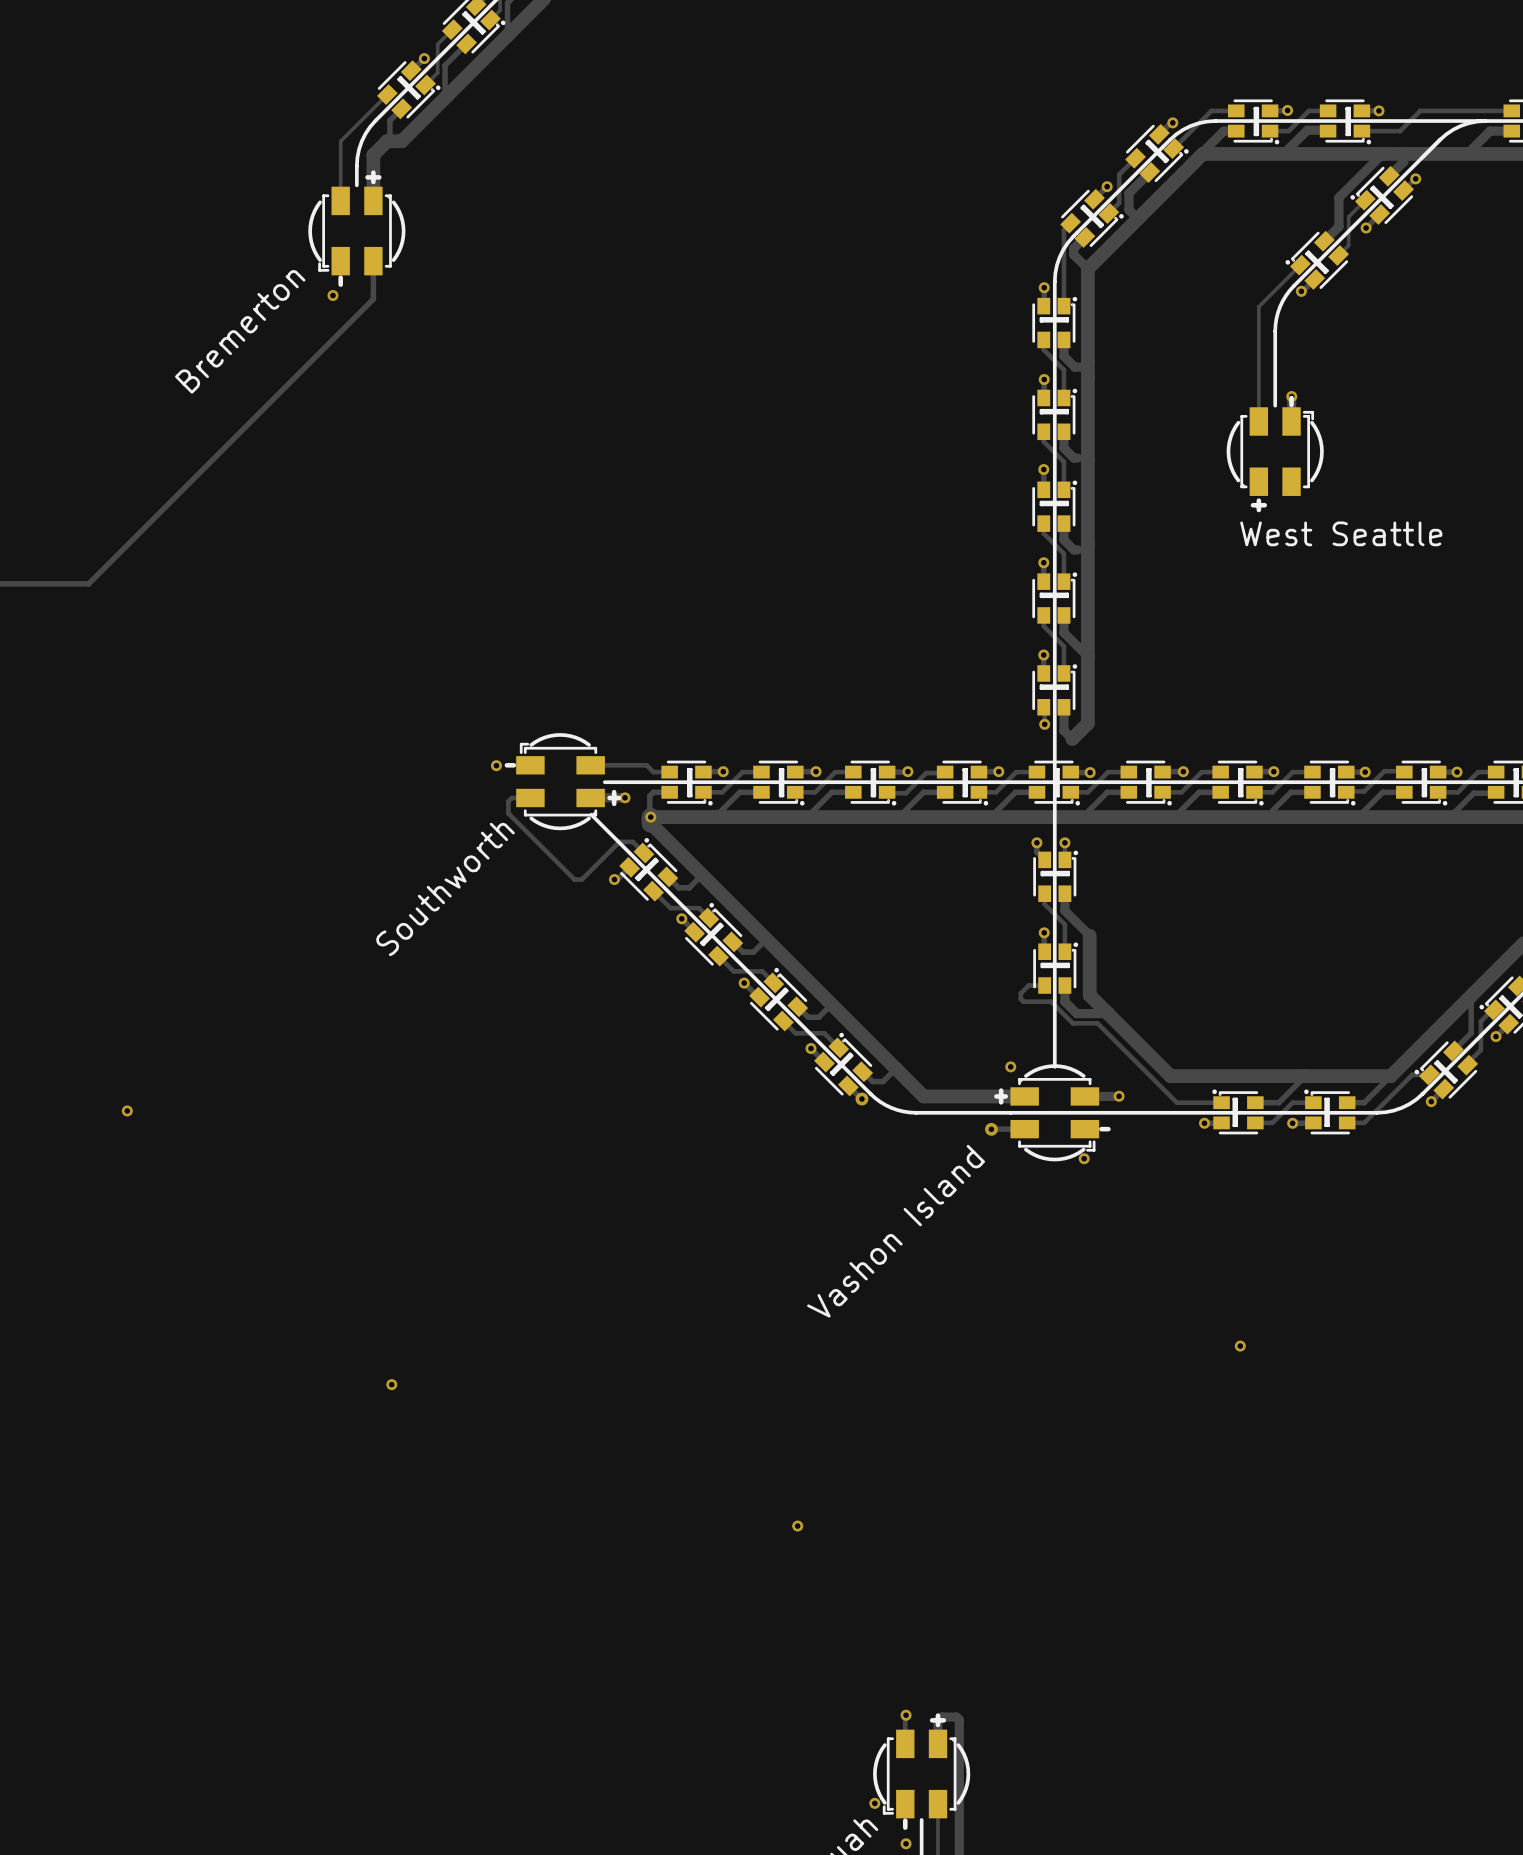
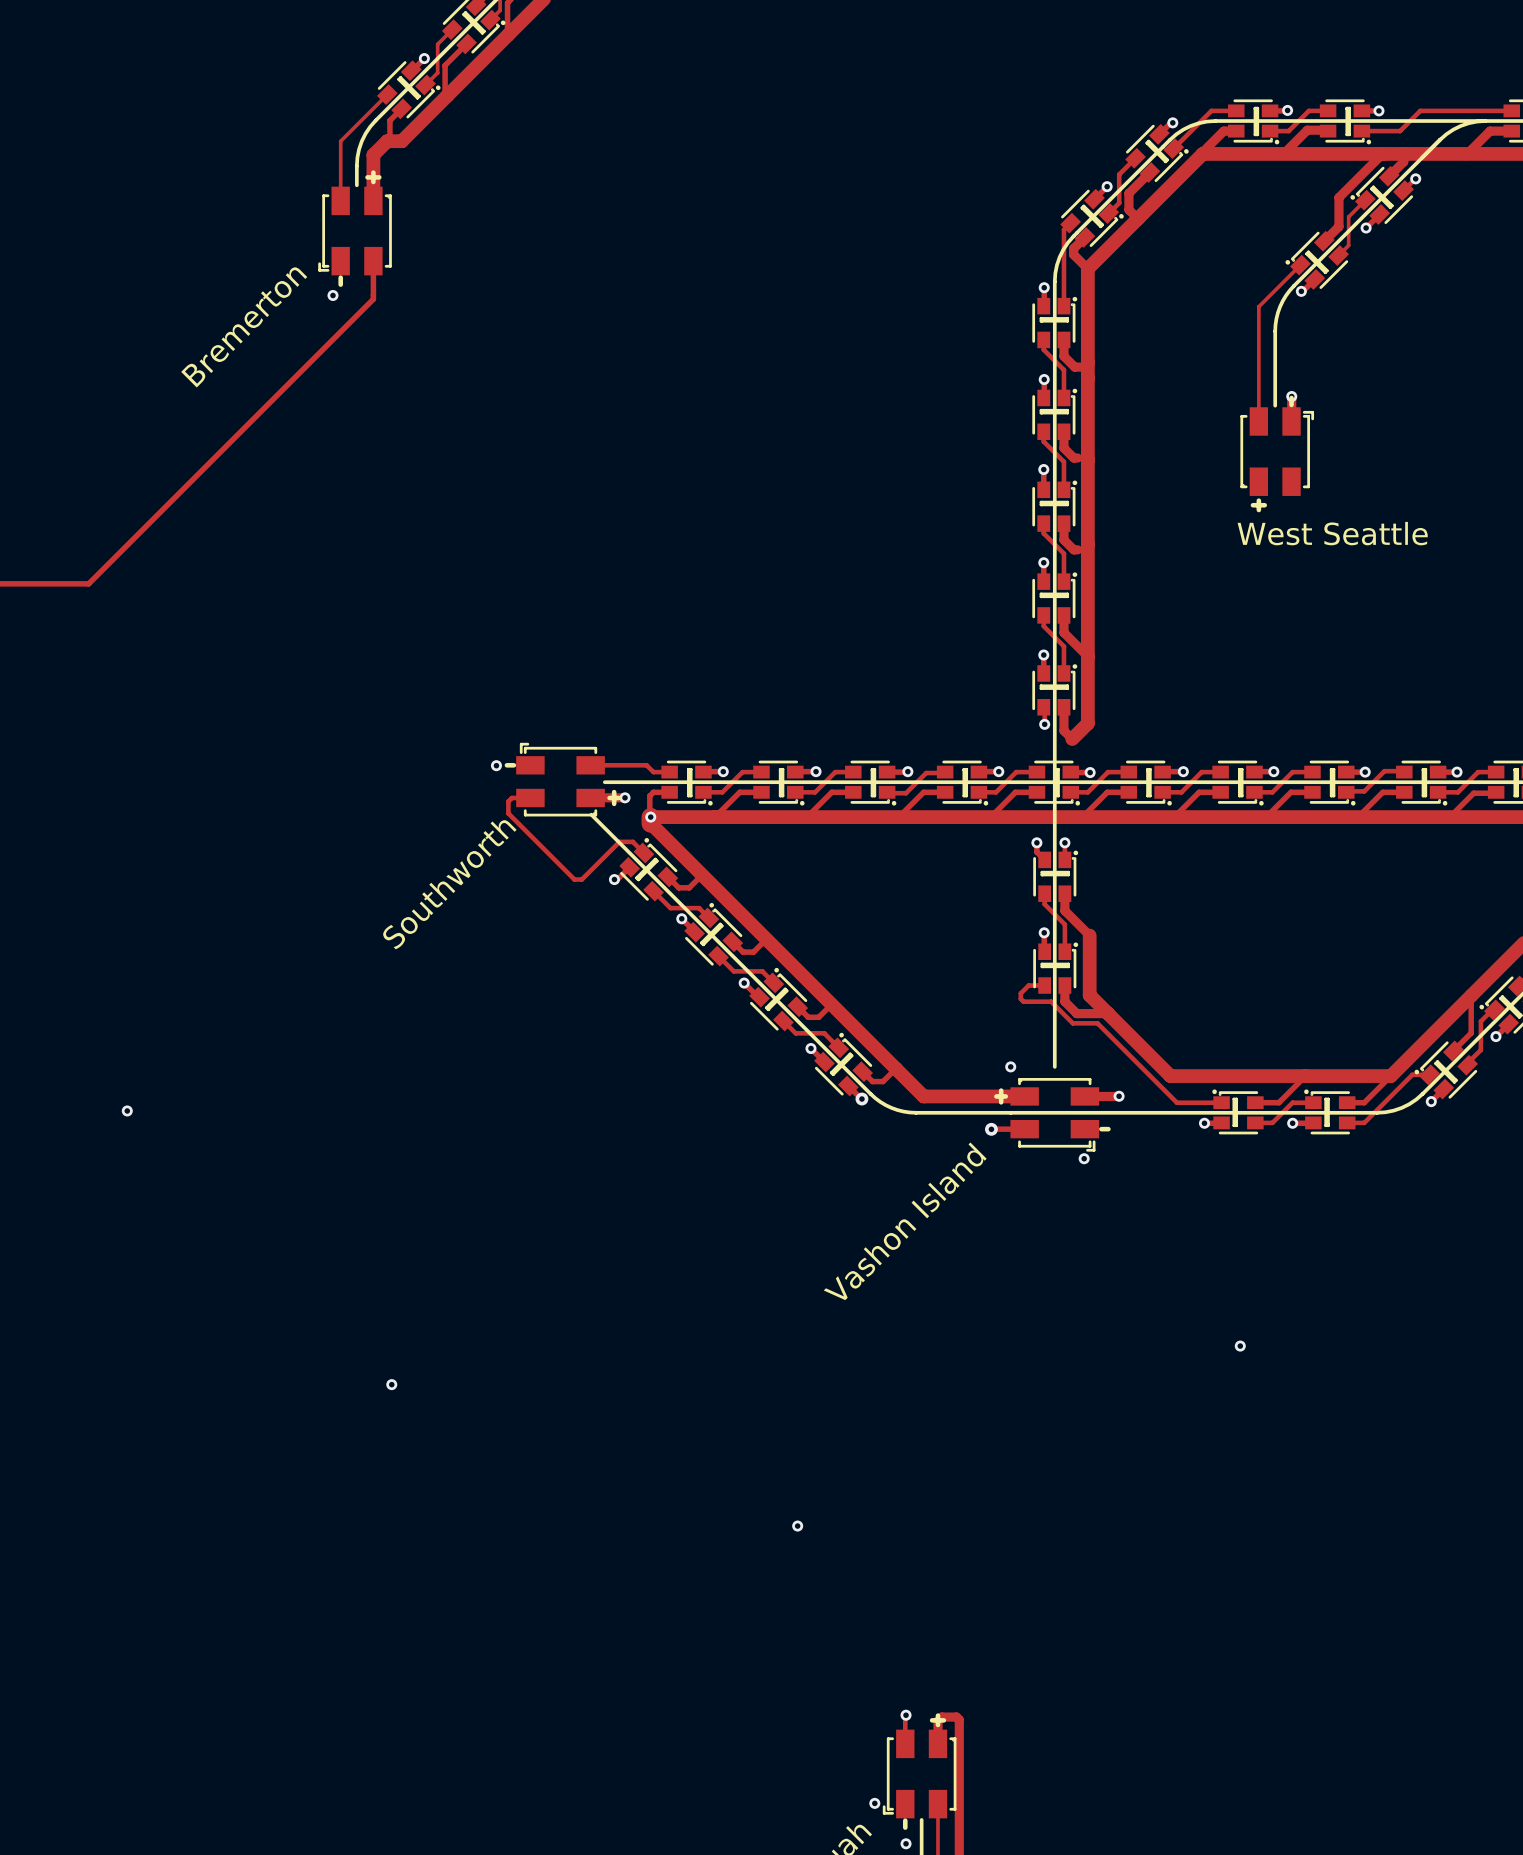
drawing: [308, 200, 406, 262] -> none
drawing: [1226, 420, 1324, 483] -> none
drawing: [529, 733, 591, 831] -> none
drawing: [1024, 1064, 1086, 1162] -> none
drawing: [873, 1743, 971, 1805] -> none

